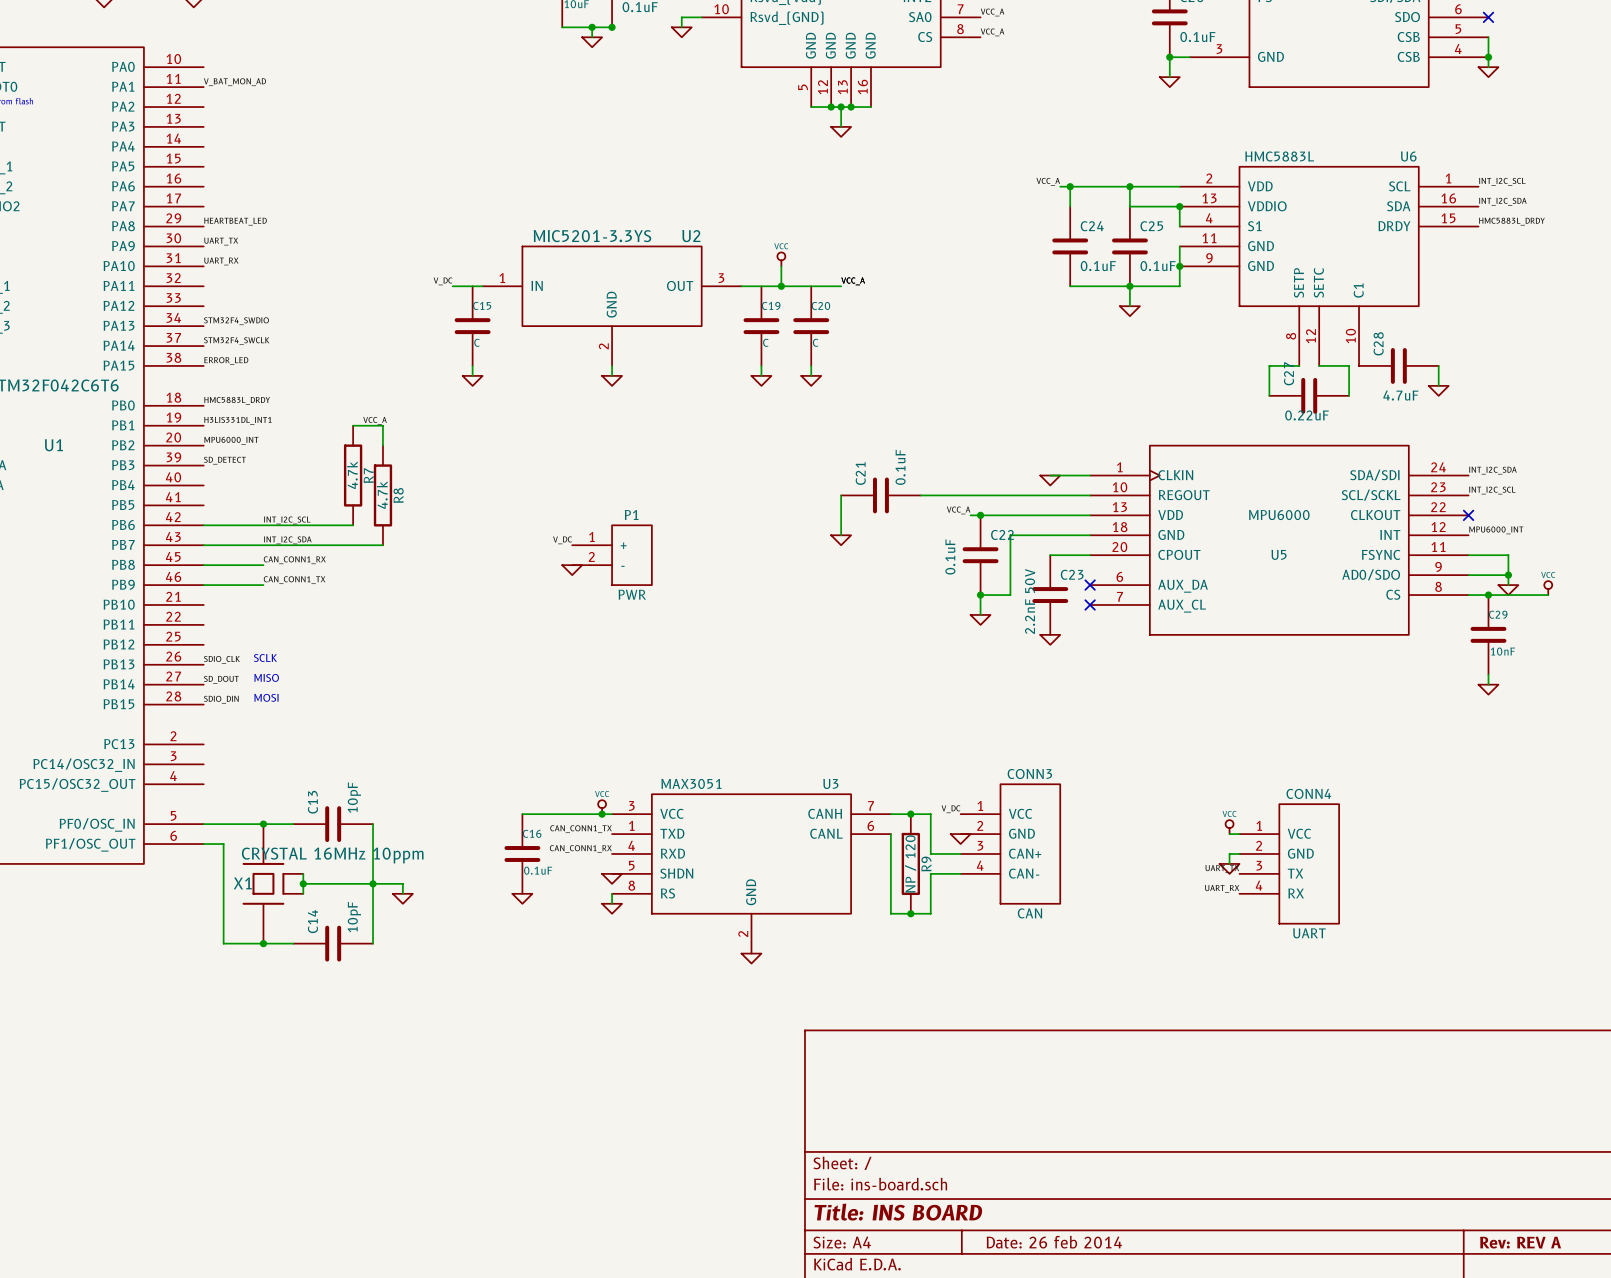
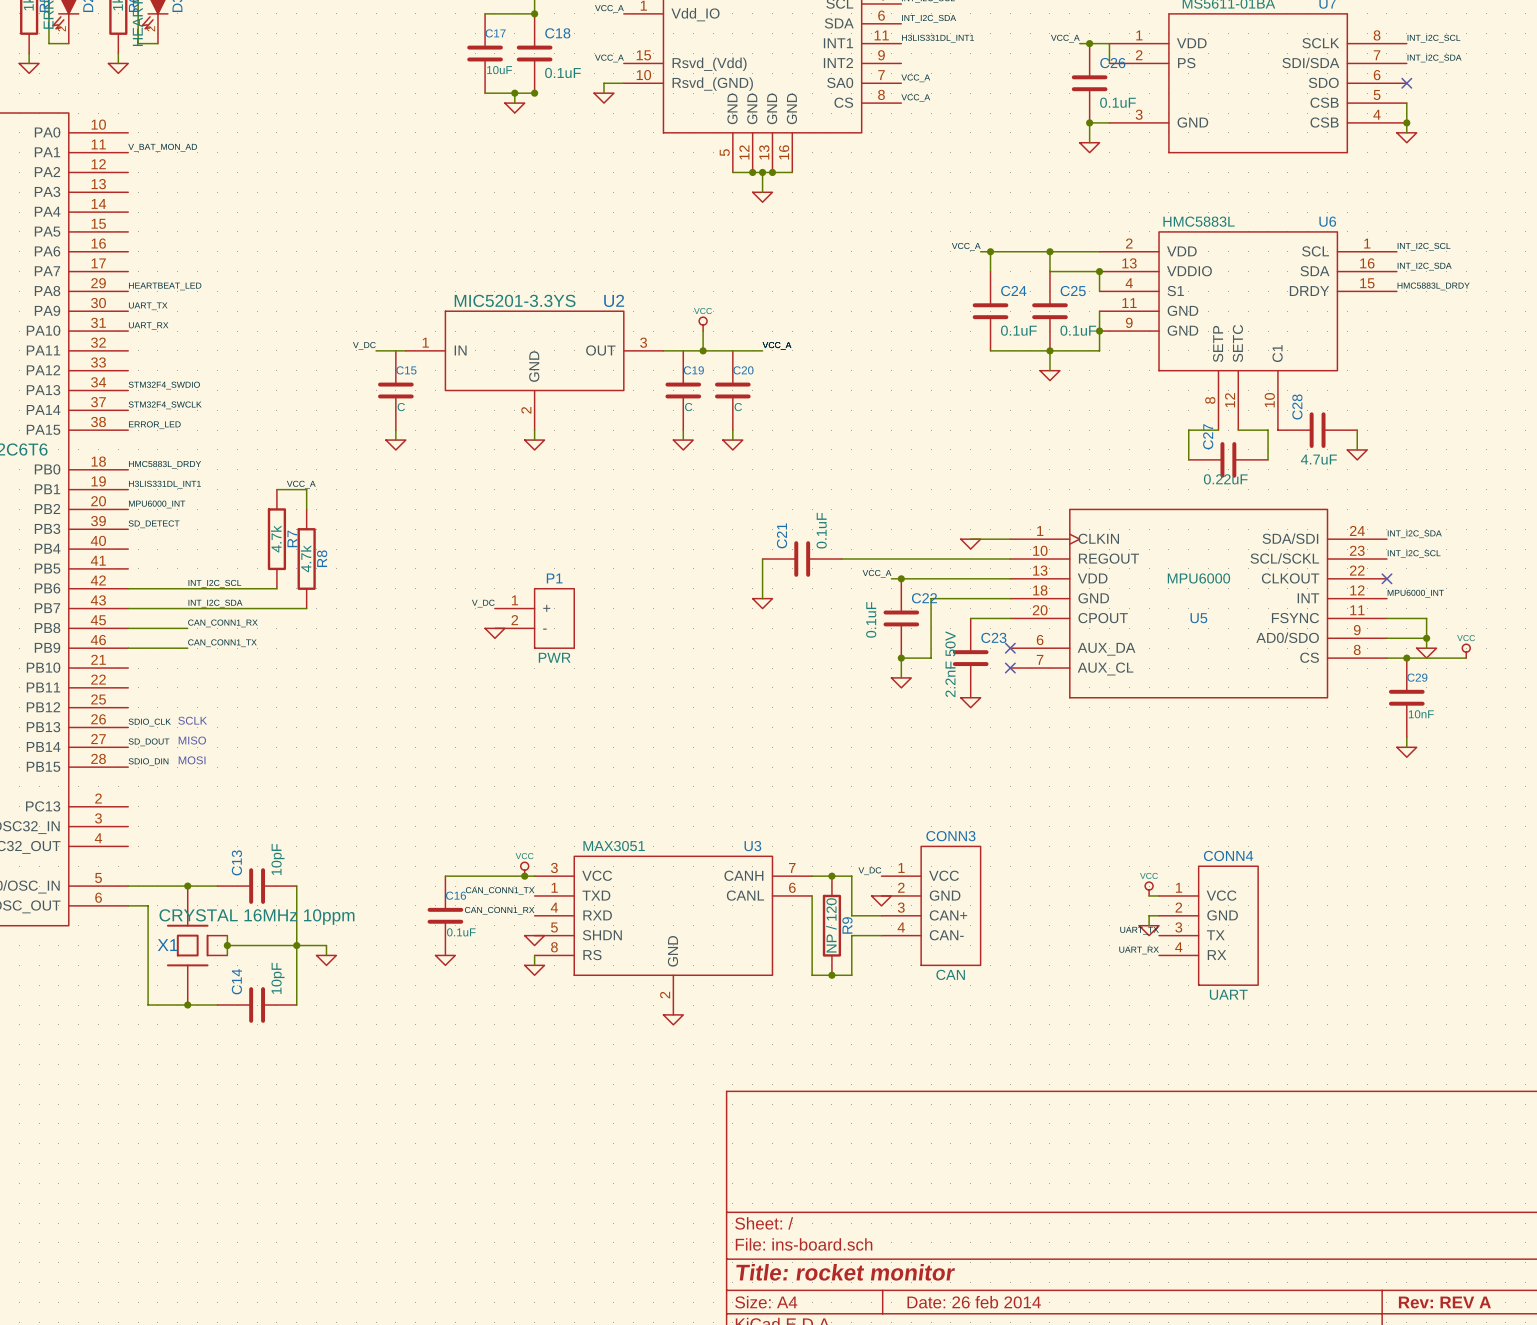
title block: Title: INS BOARD (898, 1212) -> Title: rocket monitor (845, 1272)

